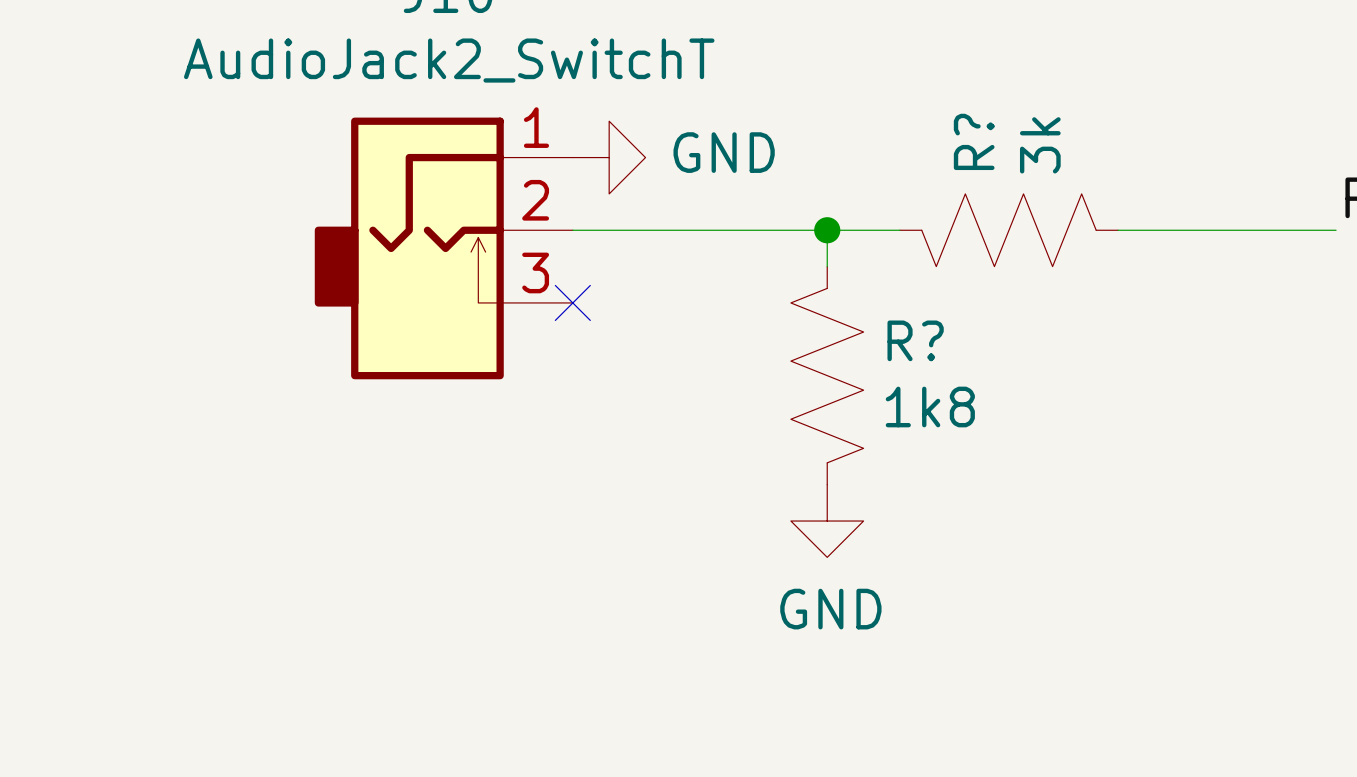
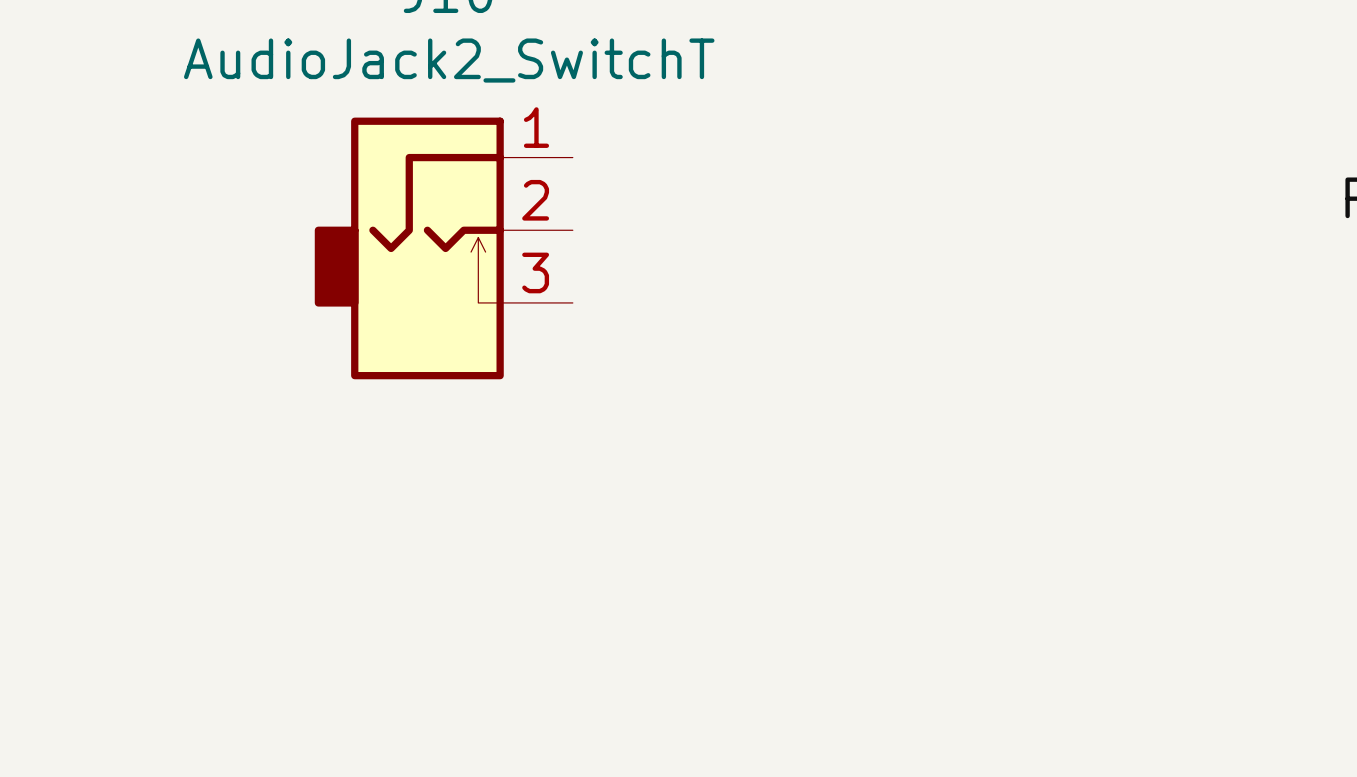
power symbol: GND (609, 157) -> none
wire: (572, 230) (899, 230) -> none
wire: (827, 230) (827, 266) -> none
junction: (827, 230) -> none
R?: 3k (1008, 230) -> none
wire: (1118, 230) (1336, 230) -> none
no-connect mark: (572, 302) -> none
R?: 1k8 (827, 375) -> none
power symbol: GND (827, 521) -> none

